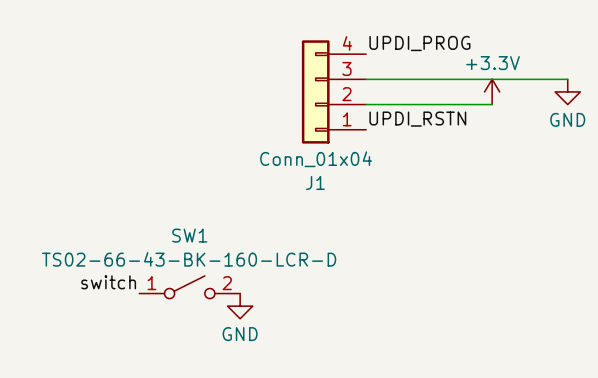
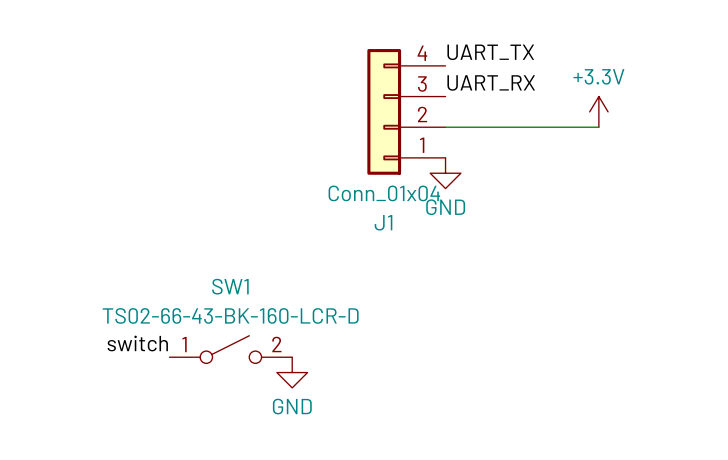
label: UPDI_PROG (419, 43) -> UART_TX (490, 52)
label: none -> UART_RX (491, 82)
wire: (366, 79) (567, 79) -> none
power symbol position: GND (567, 91) -> GND (445, 173)
label: UPDI_RSTN (417, 119) -> none

